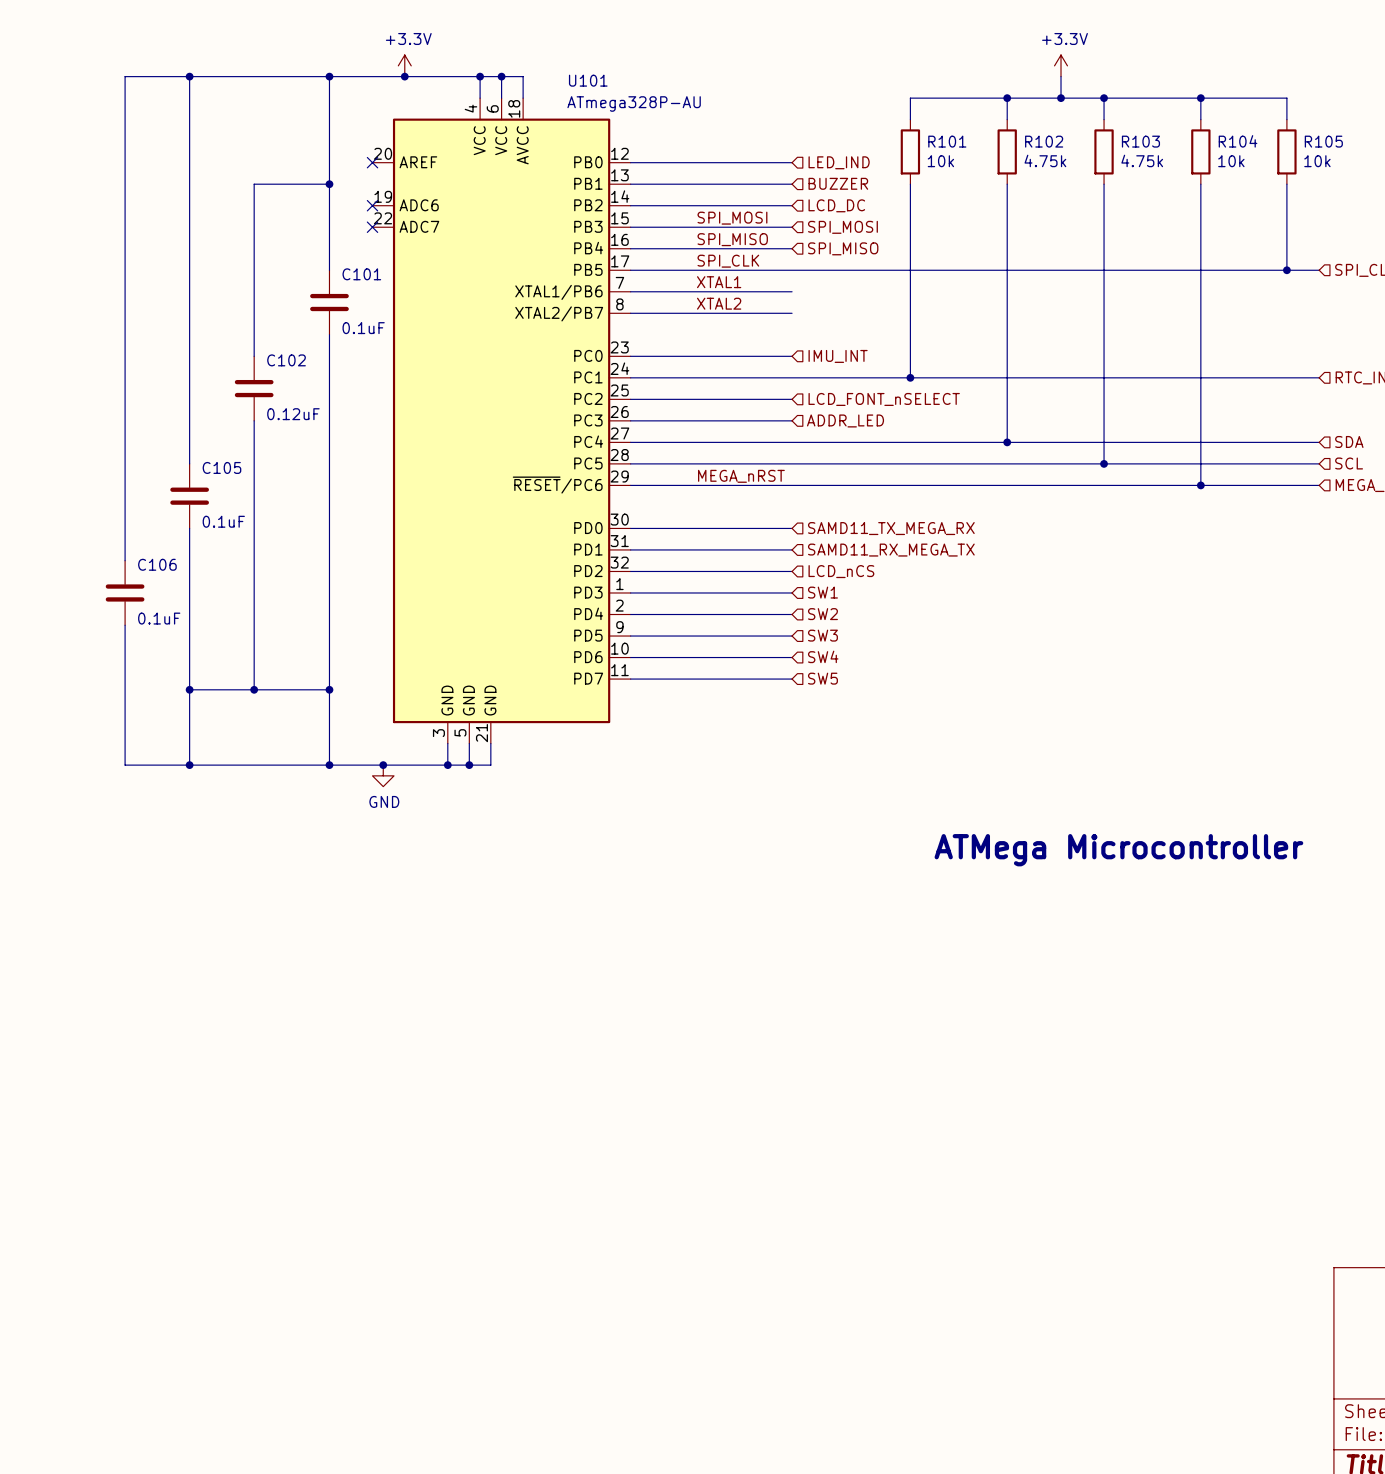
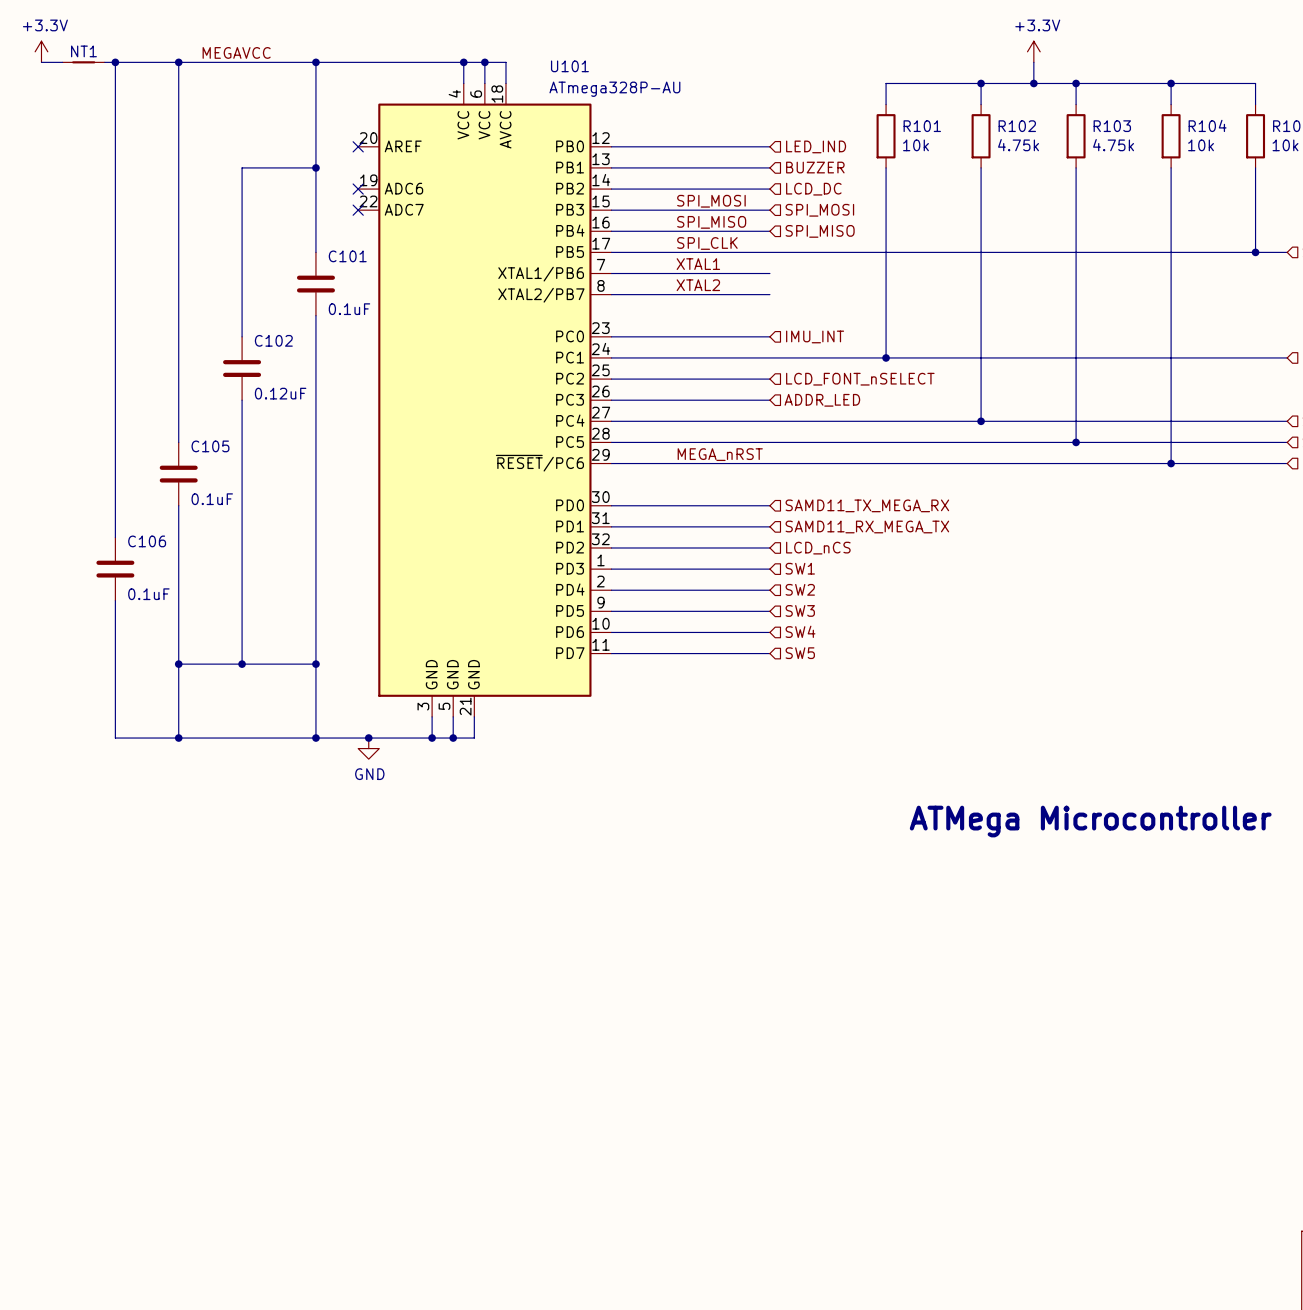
power symbol: none -> +3.3V (41, 51)
power symbol: +3.3V (404, 65) -> none
label: none -> MEGAVCC (236, 52)
wire: none -> (41, 62) (62, 62)
NT1: none -> (83, 62)
wire: none -> (104, 62) (115, 62)
junction: none -> (115, 62)
junction: (404, 76) -> none

